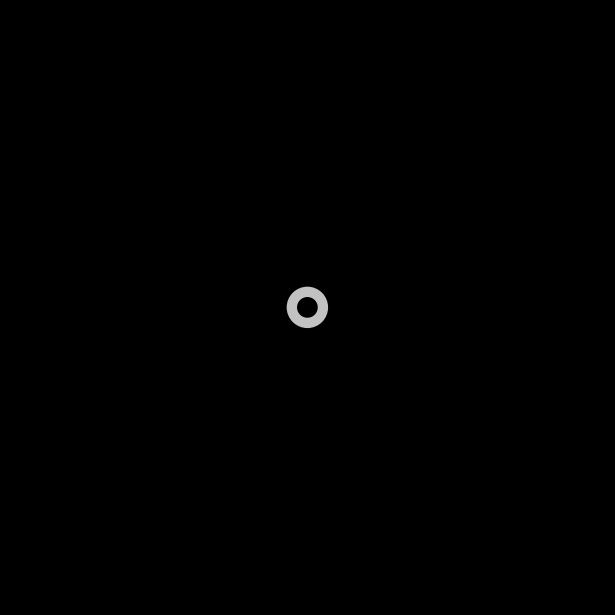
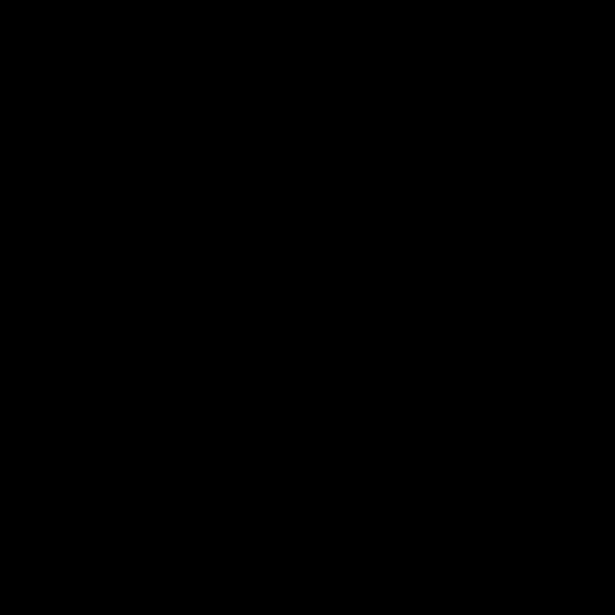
via: (307, 307) -> none

